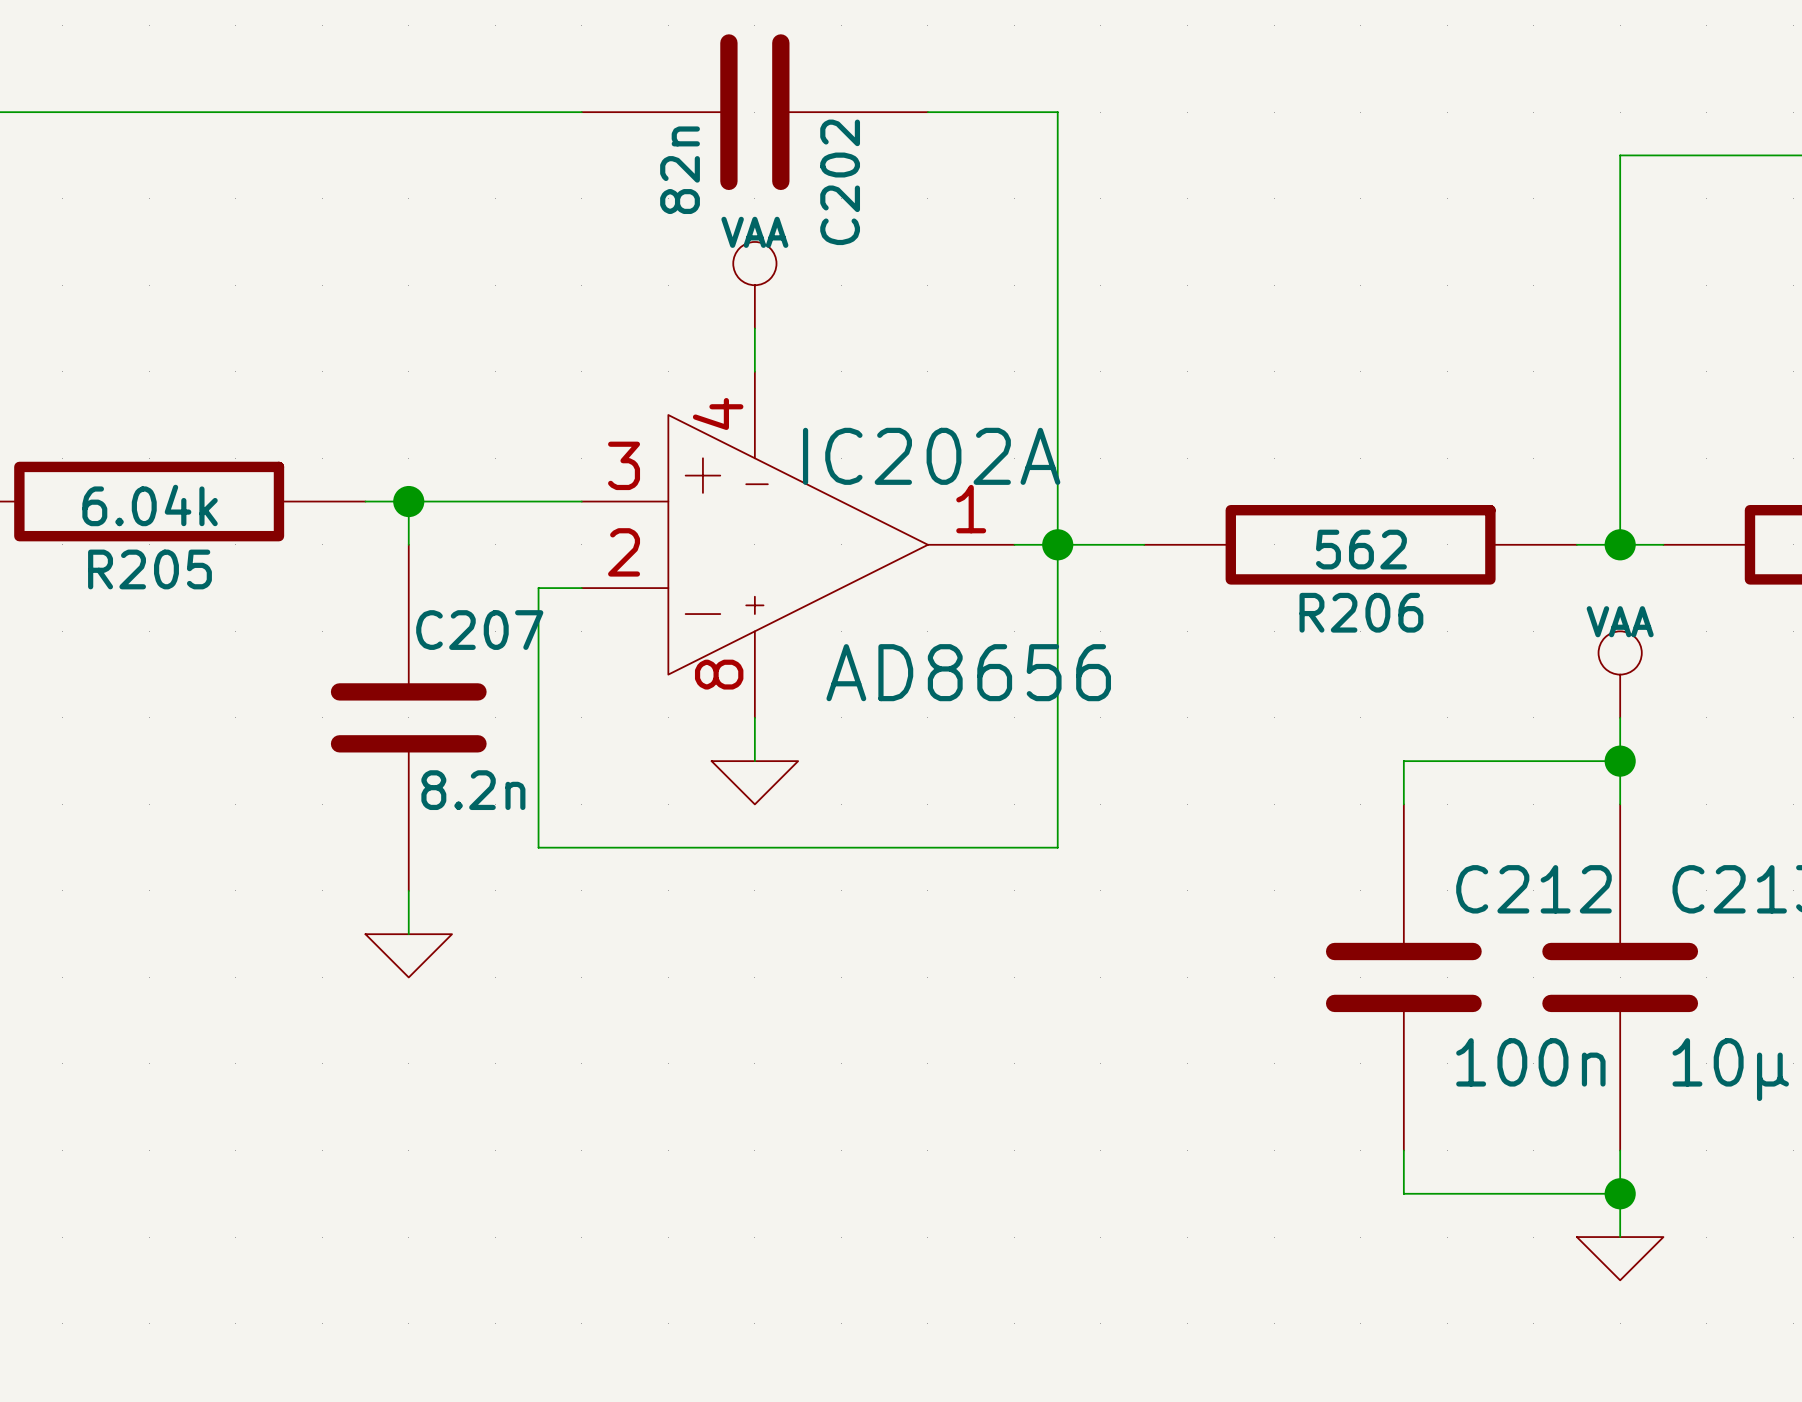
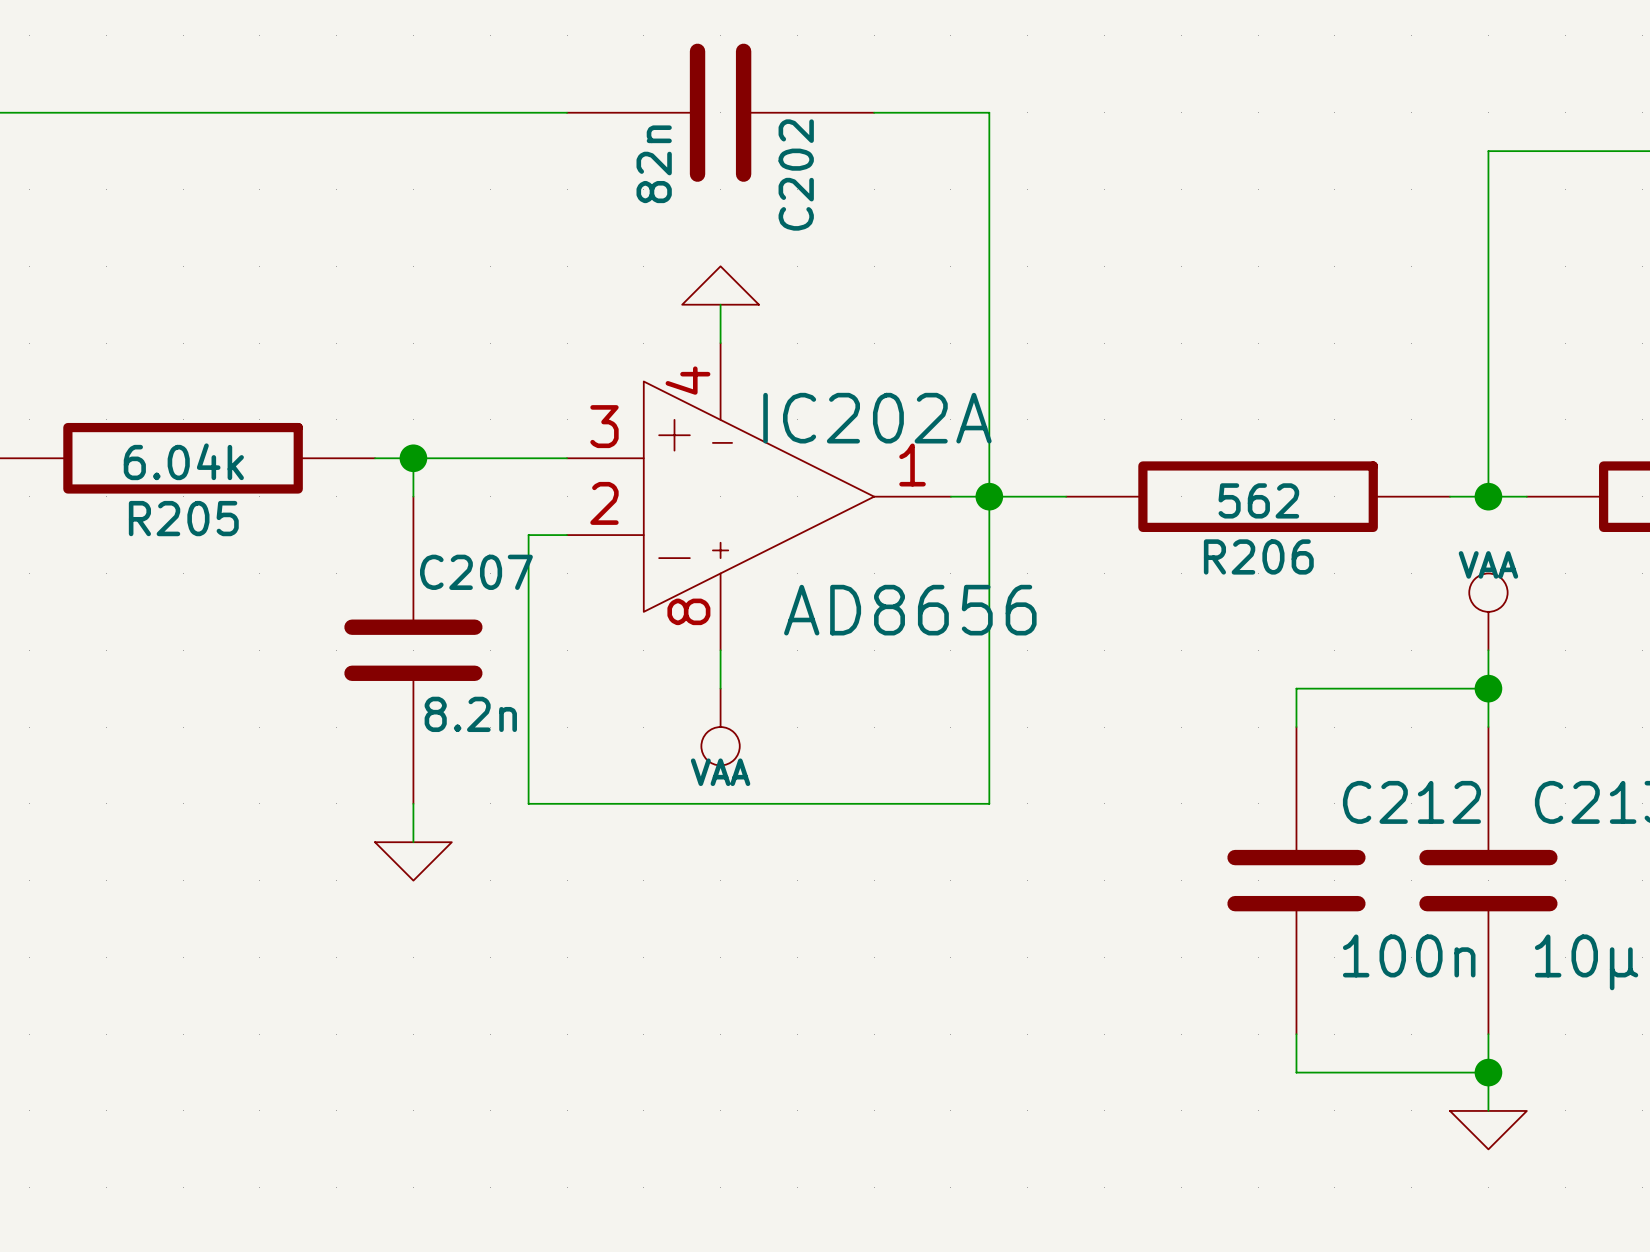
power symbol text: VAA (754, 232) -> none
power symbol shape: [733, 241, 777, 329] -> [682, 266, 759, 305]
power symbol shape: [711, 761, 799, 805] -> [701, 688, 740, 766]
wire: (538, 847) (1057, 847) -> (528, 765) (528, 803) (989, 803) (989, 765)
power symbol text: none -> VAA (720, 772)

